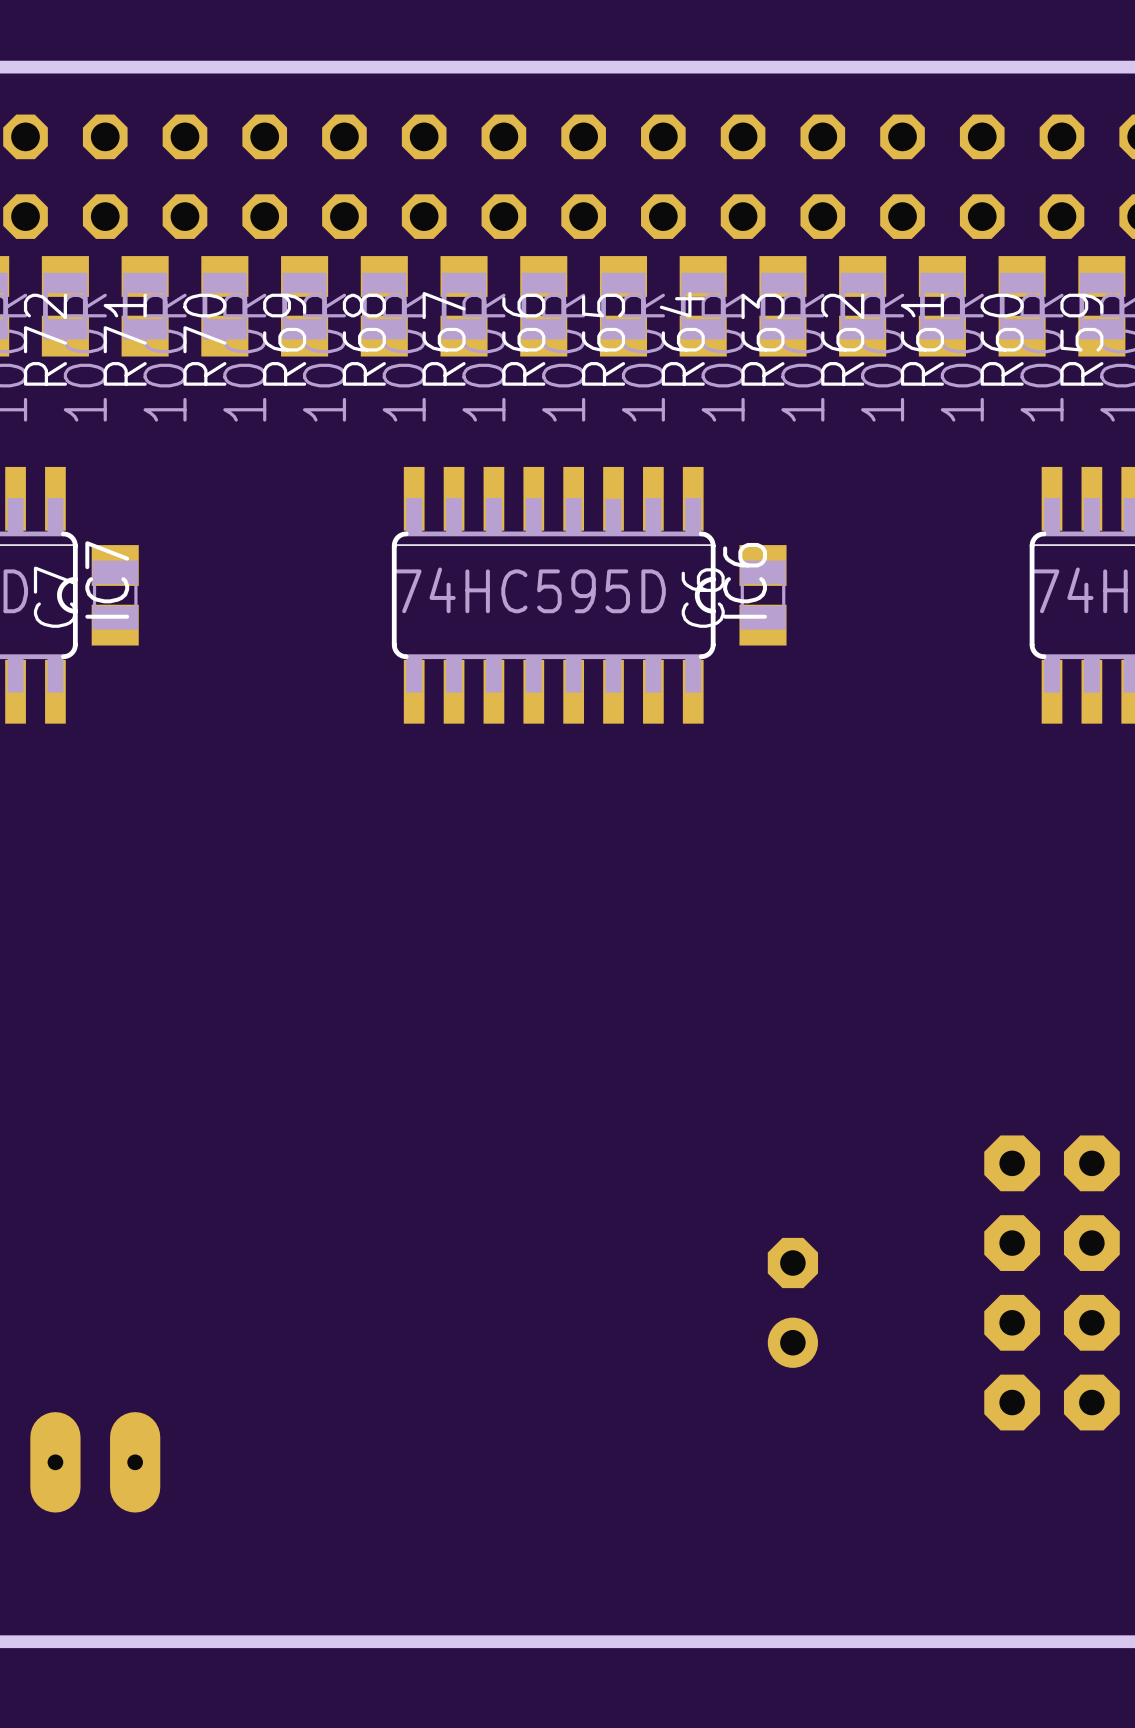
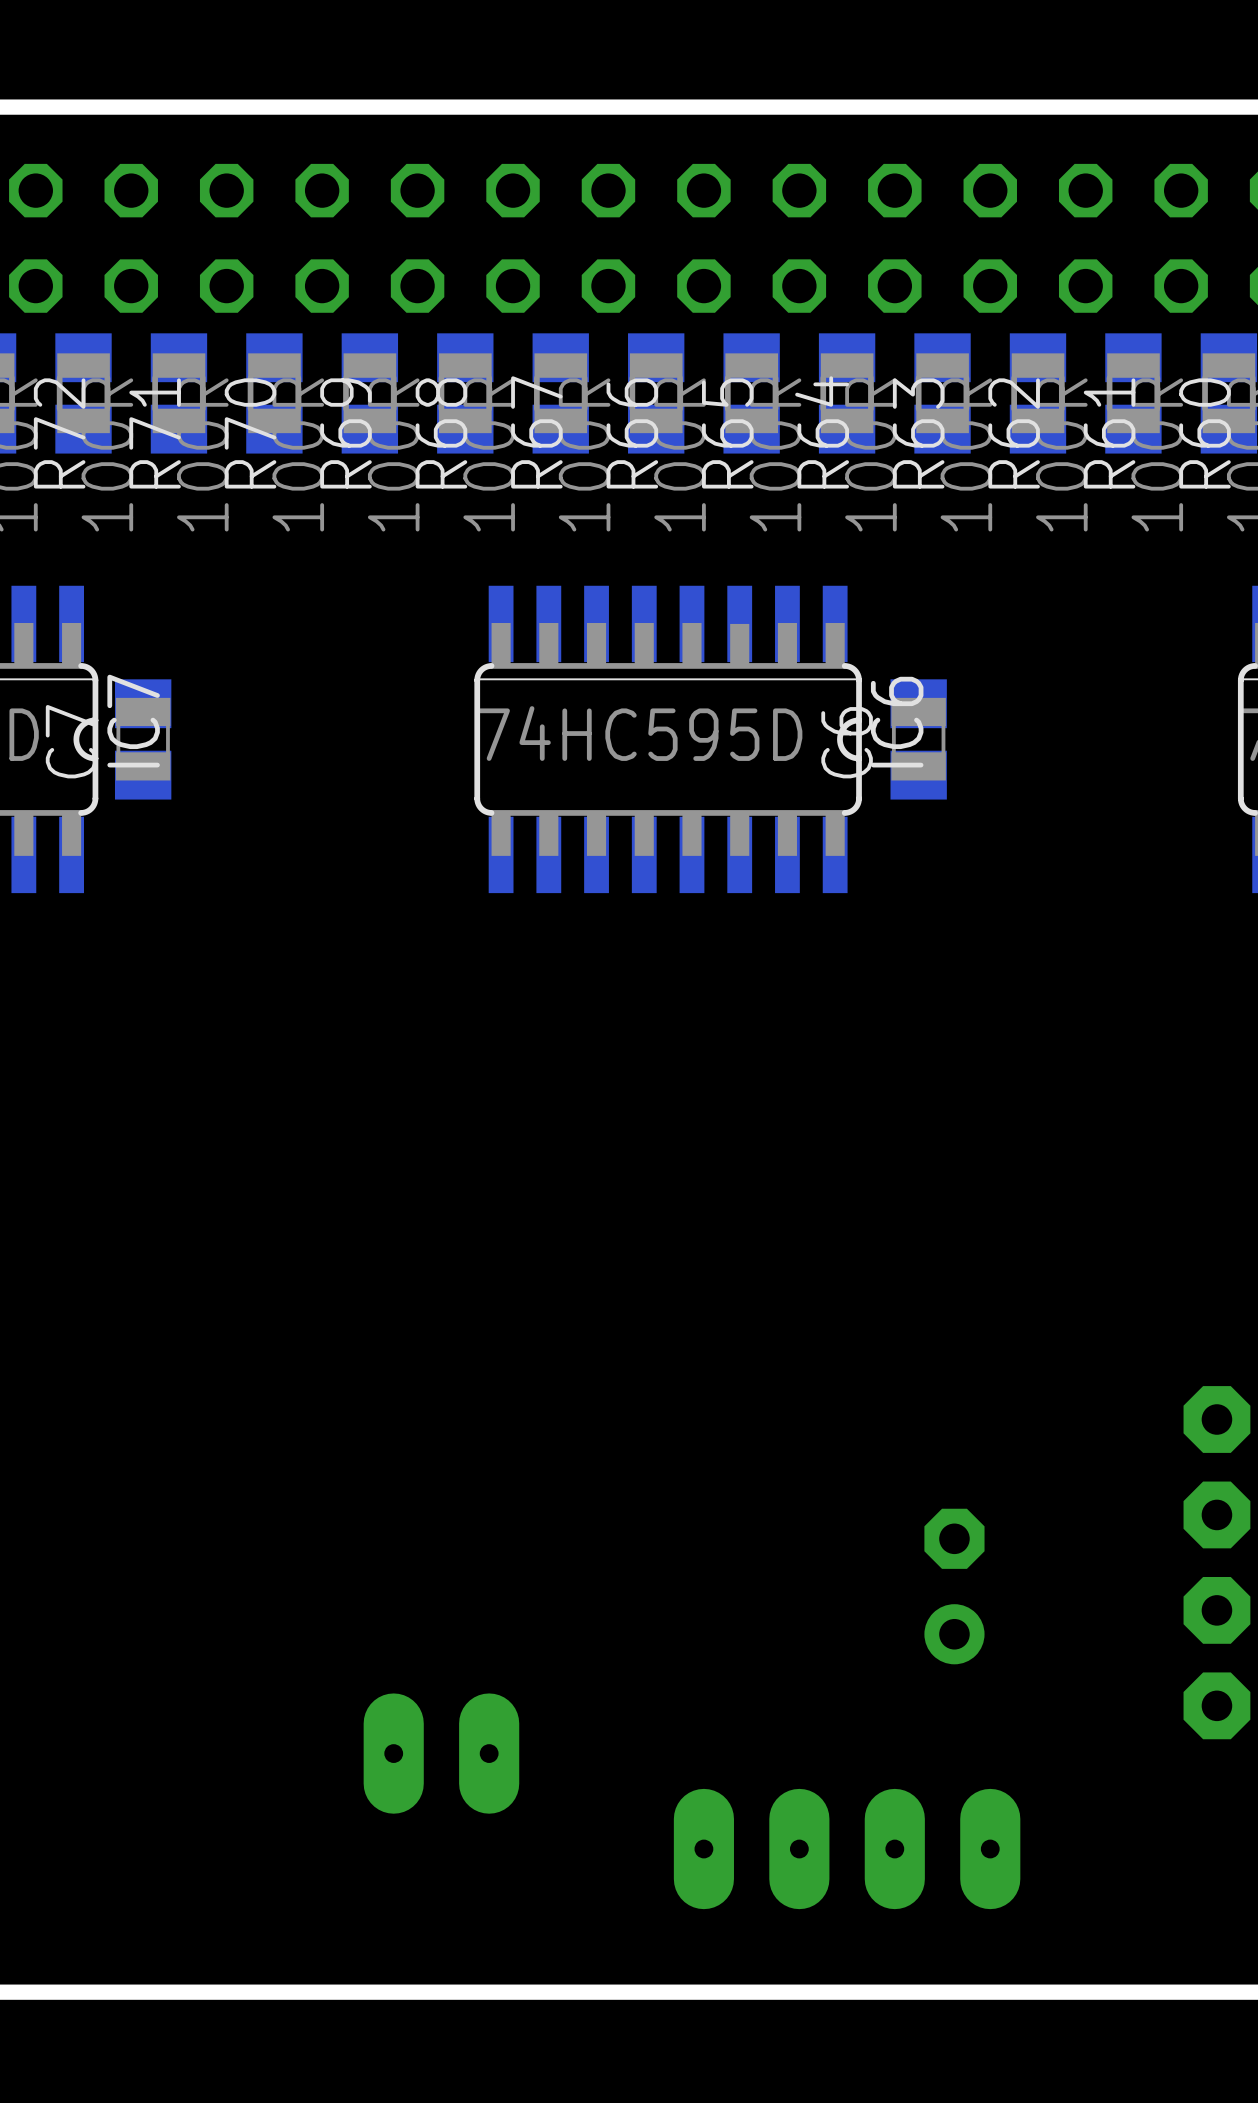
part position: (95, 1462) -> (441, 1753)
part: none -> (847, 1849)

